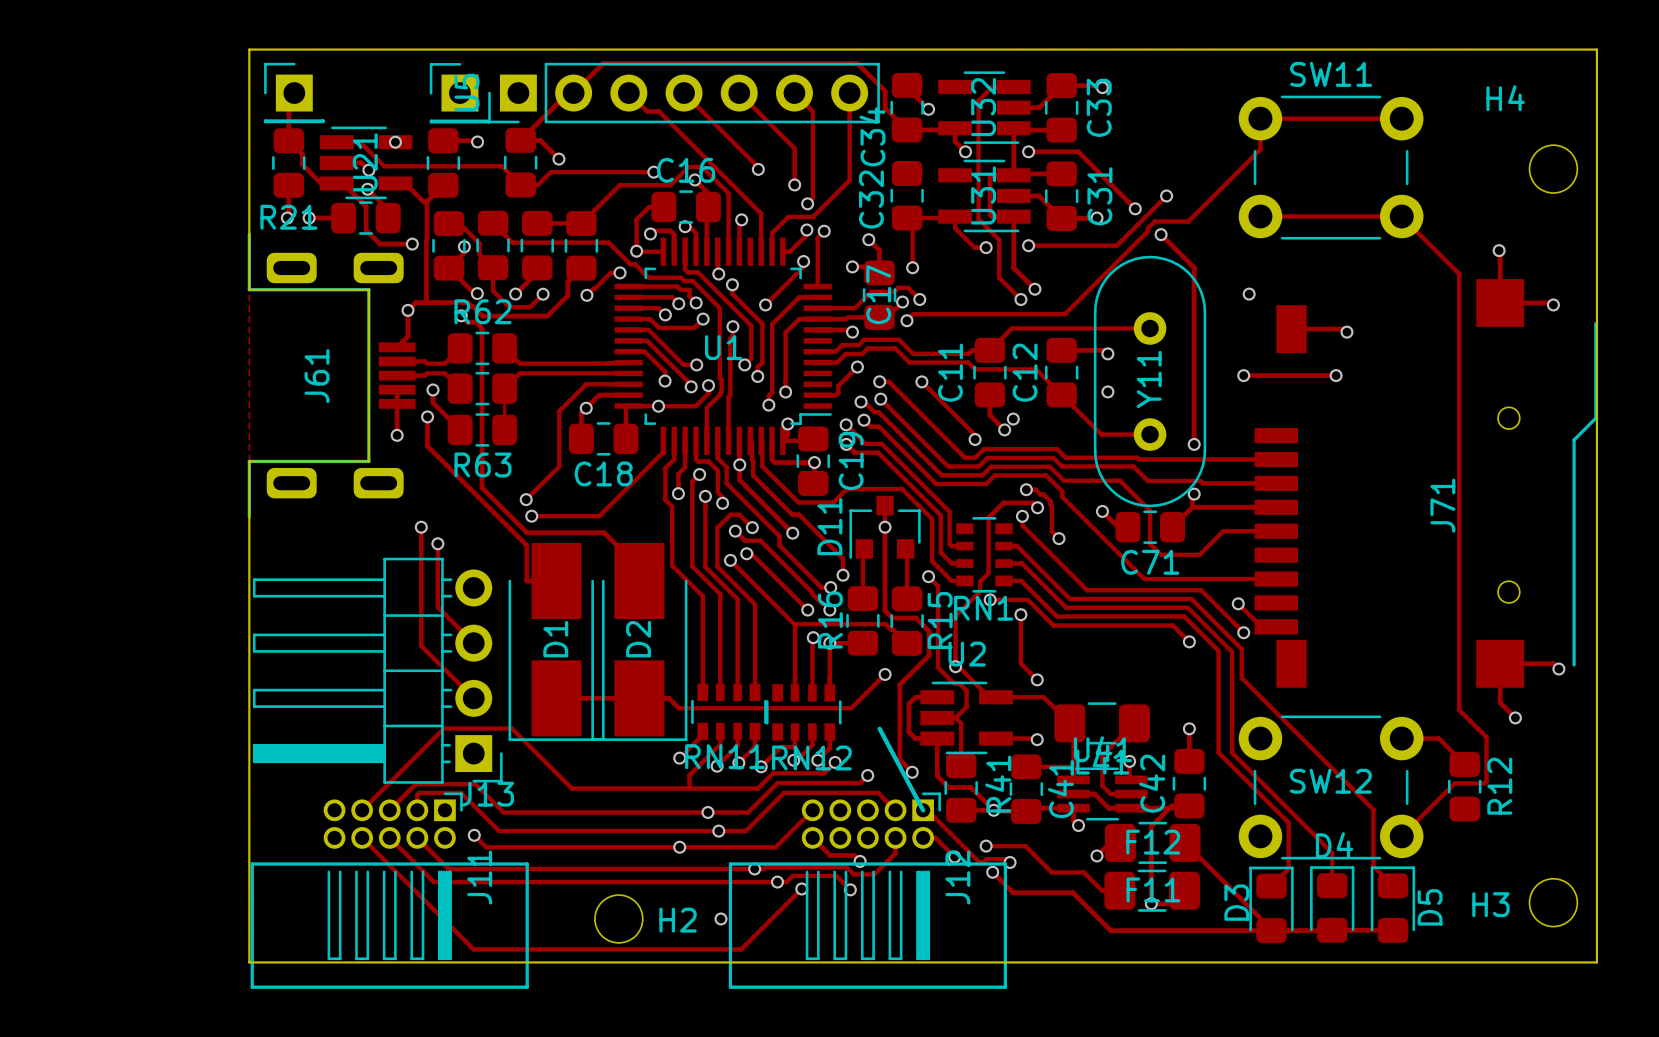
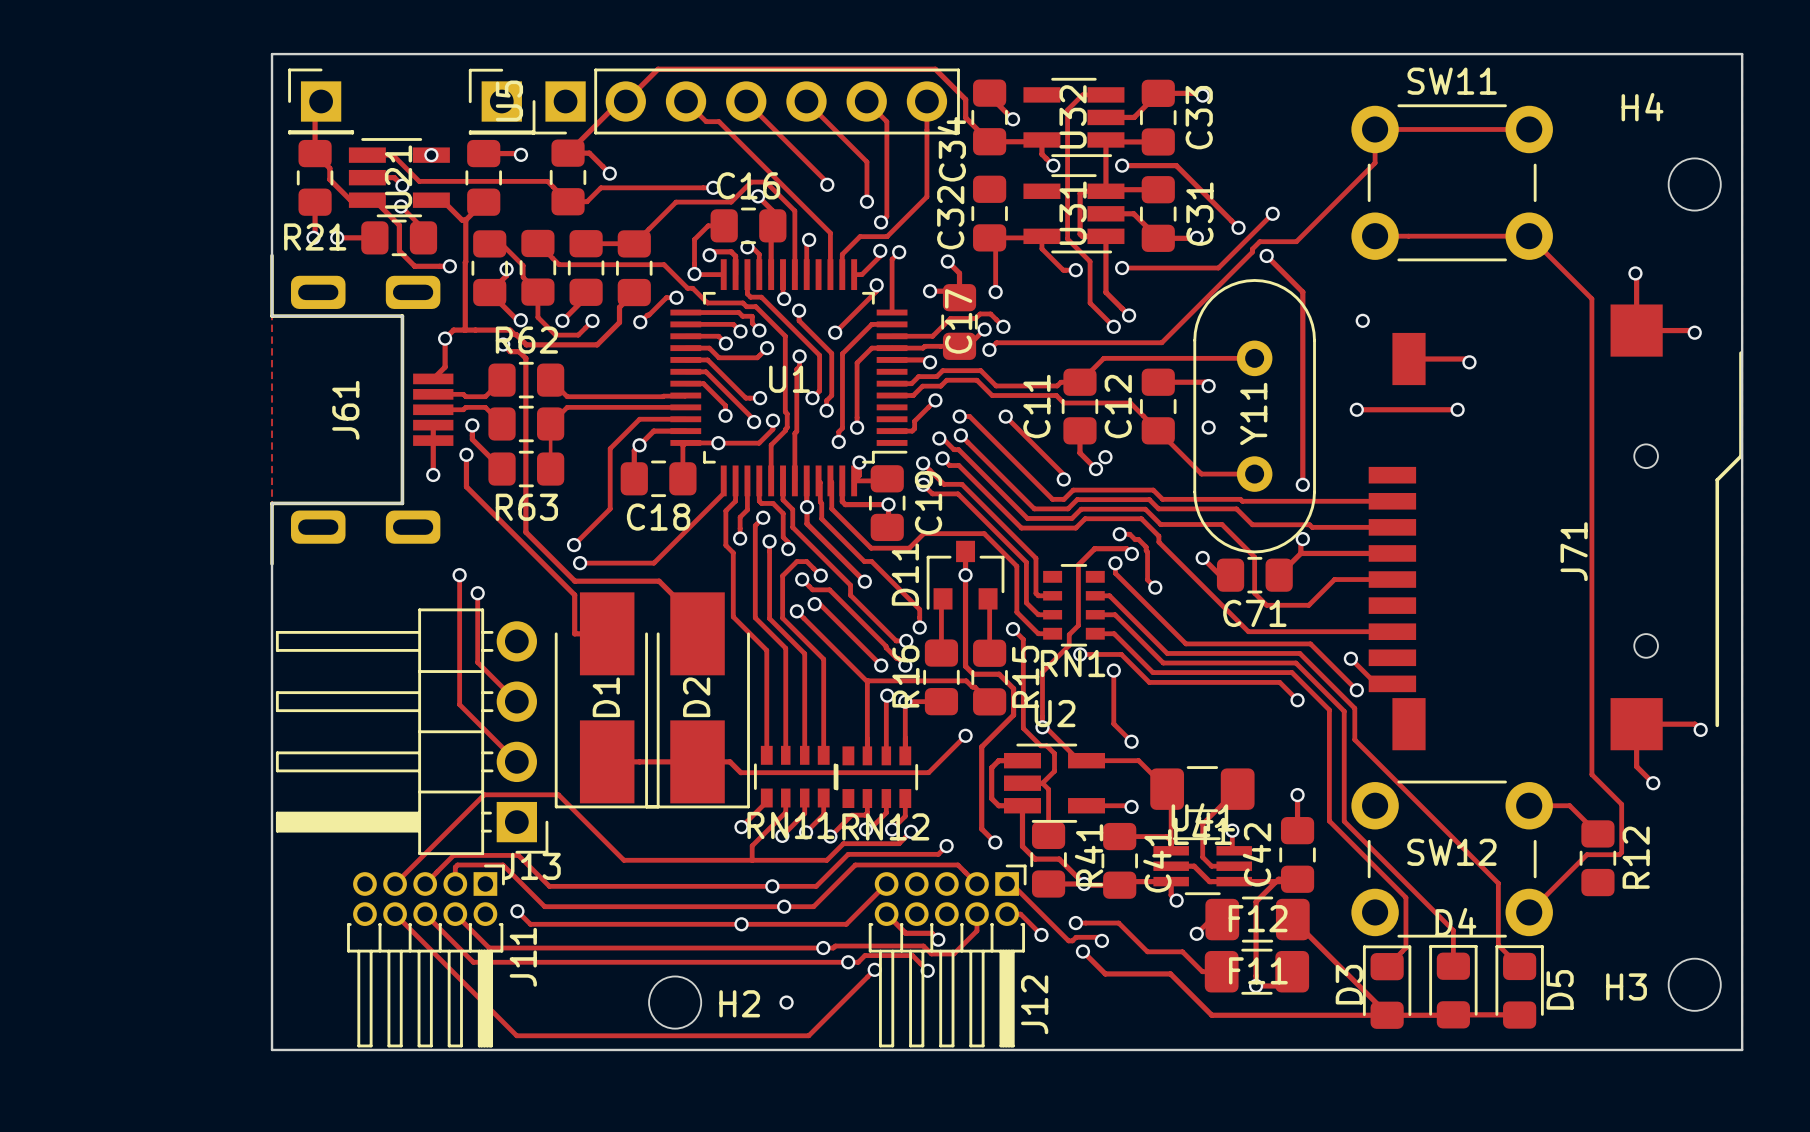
line: (879, 728) (923, 810) -> none
J11 footprint: [250, 792, 529, 989] -> [347, 864, 505, 1048]
J12 footprint: [728, 792, 1008, 989] -> [868, 864, 1027, 1048]
J12 name position: J12 (957, 877) -> J12 (1034, 1004)

